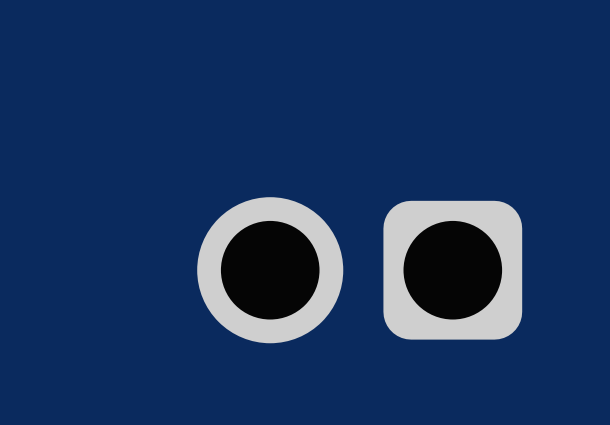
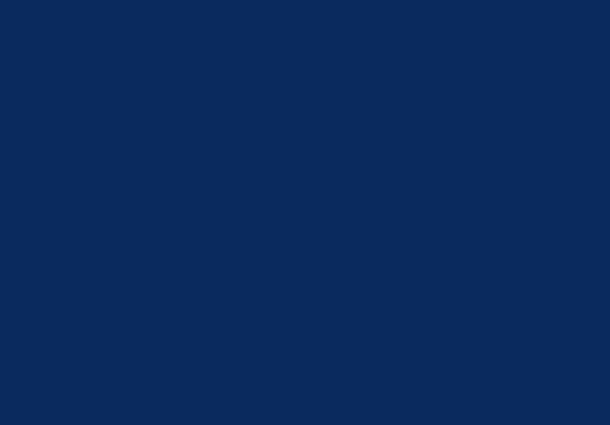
part: (359, 270) -> none

